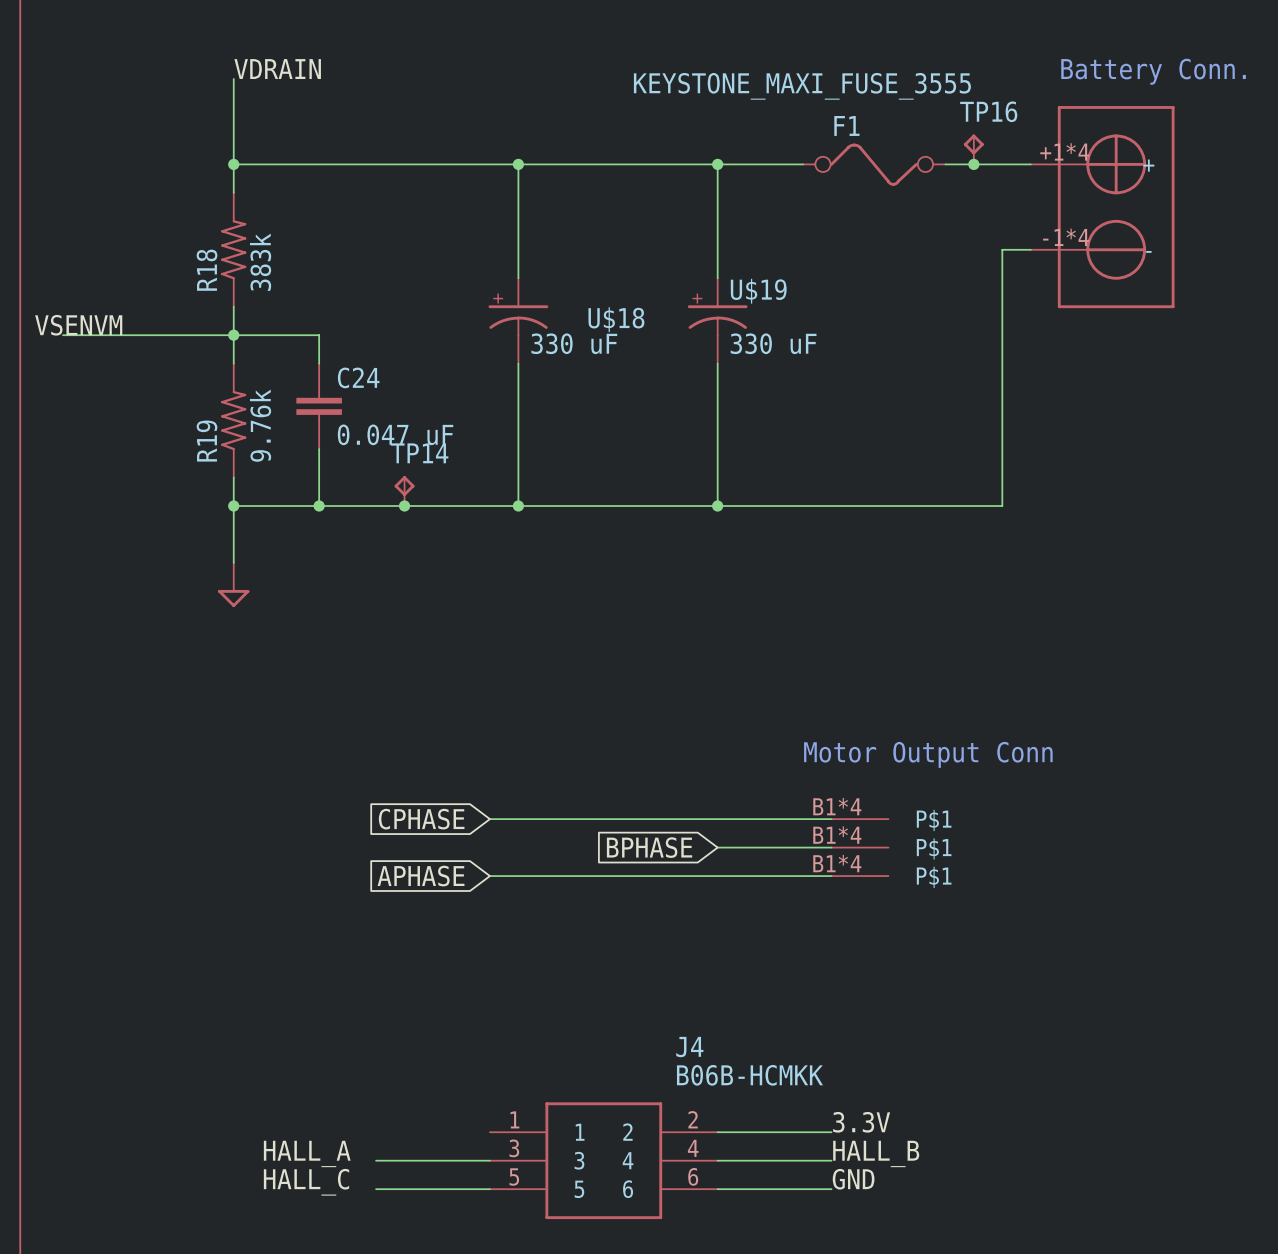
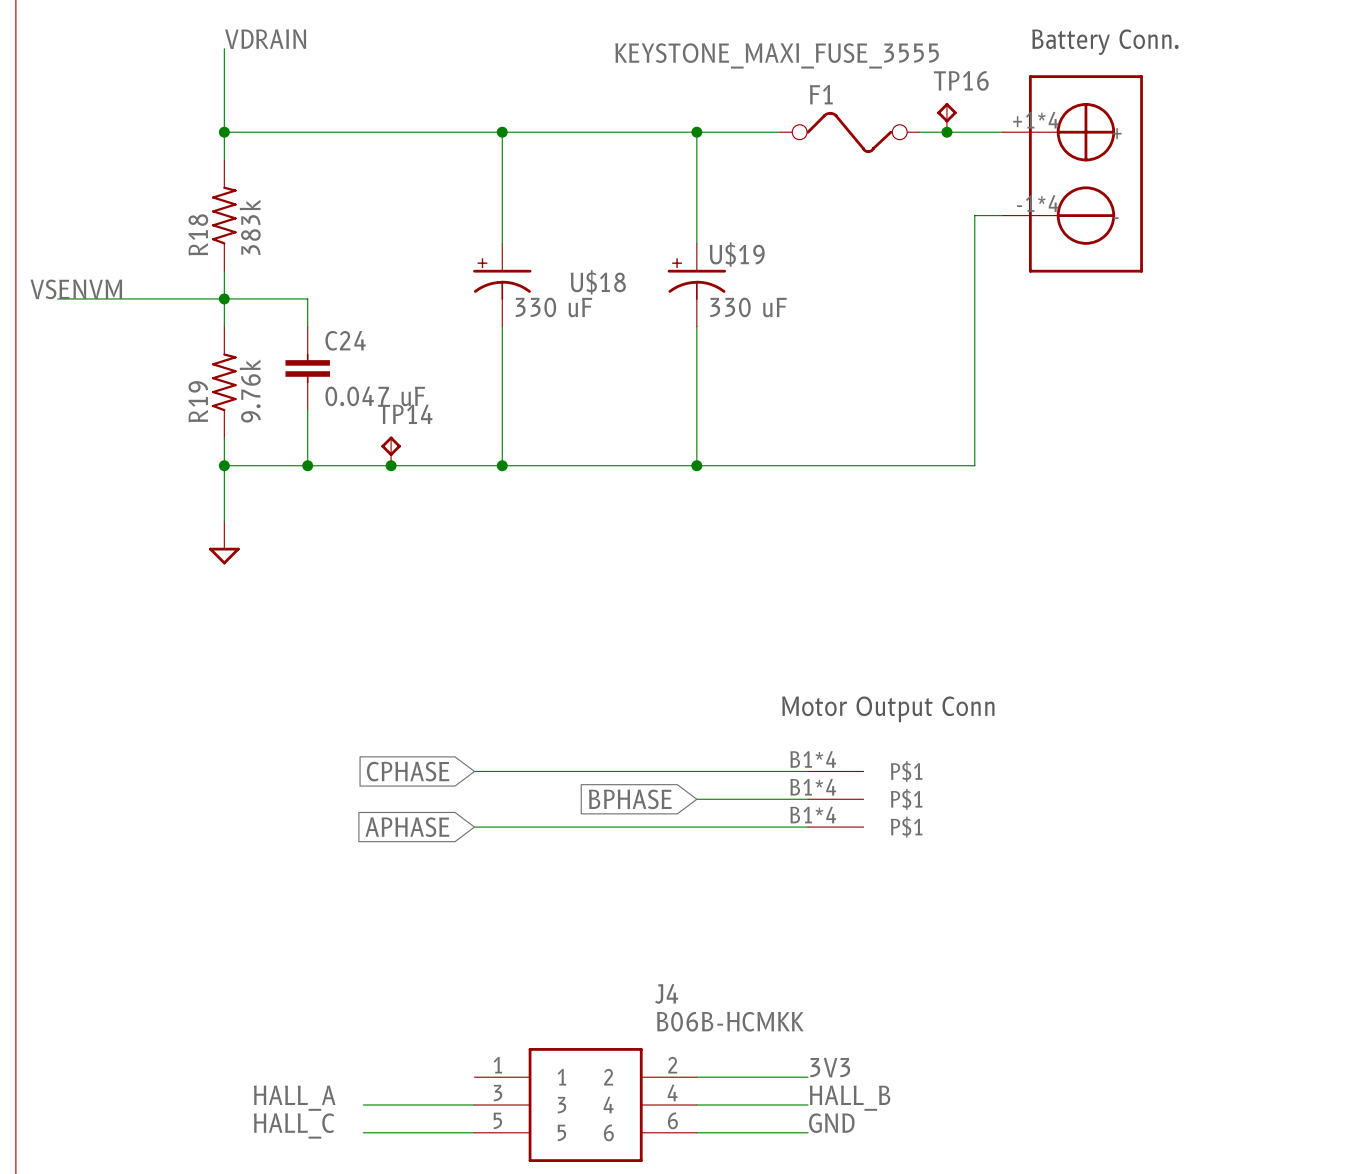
label: 3.3V (861, 1122) -> 3V3 (830, 1067)

